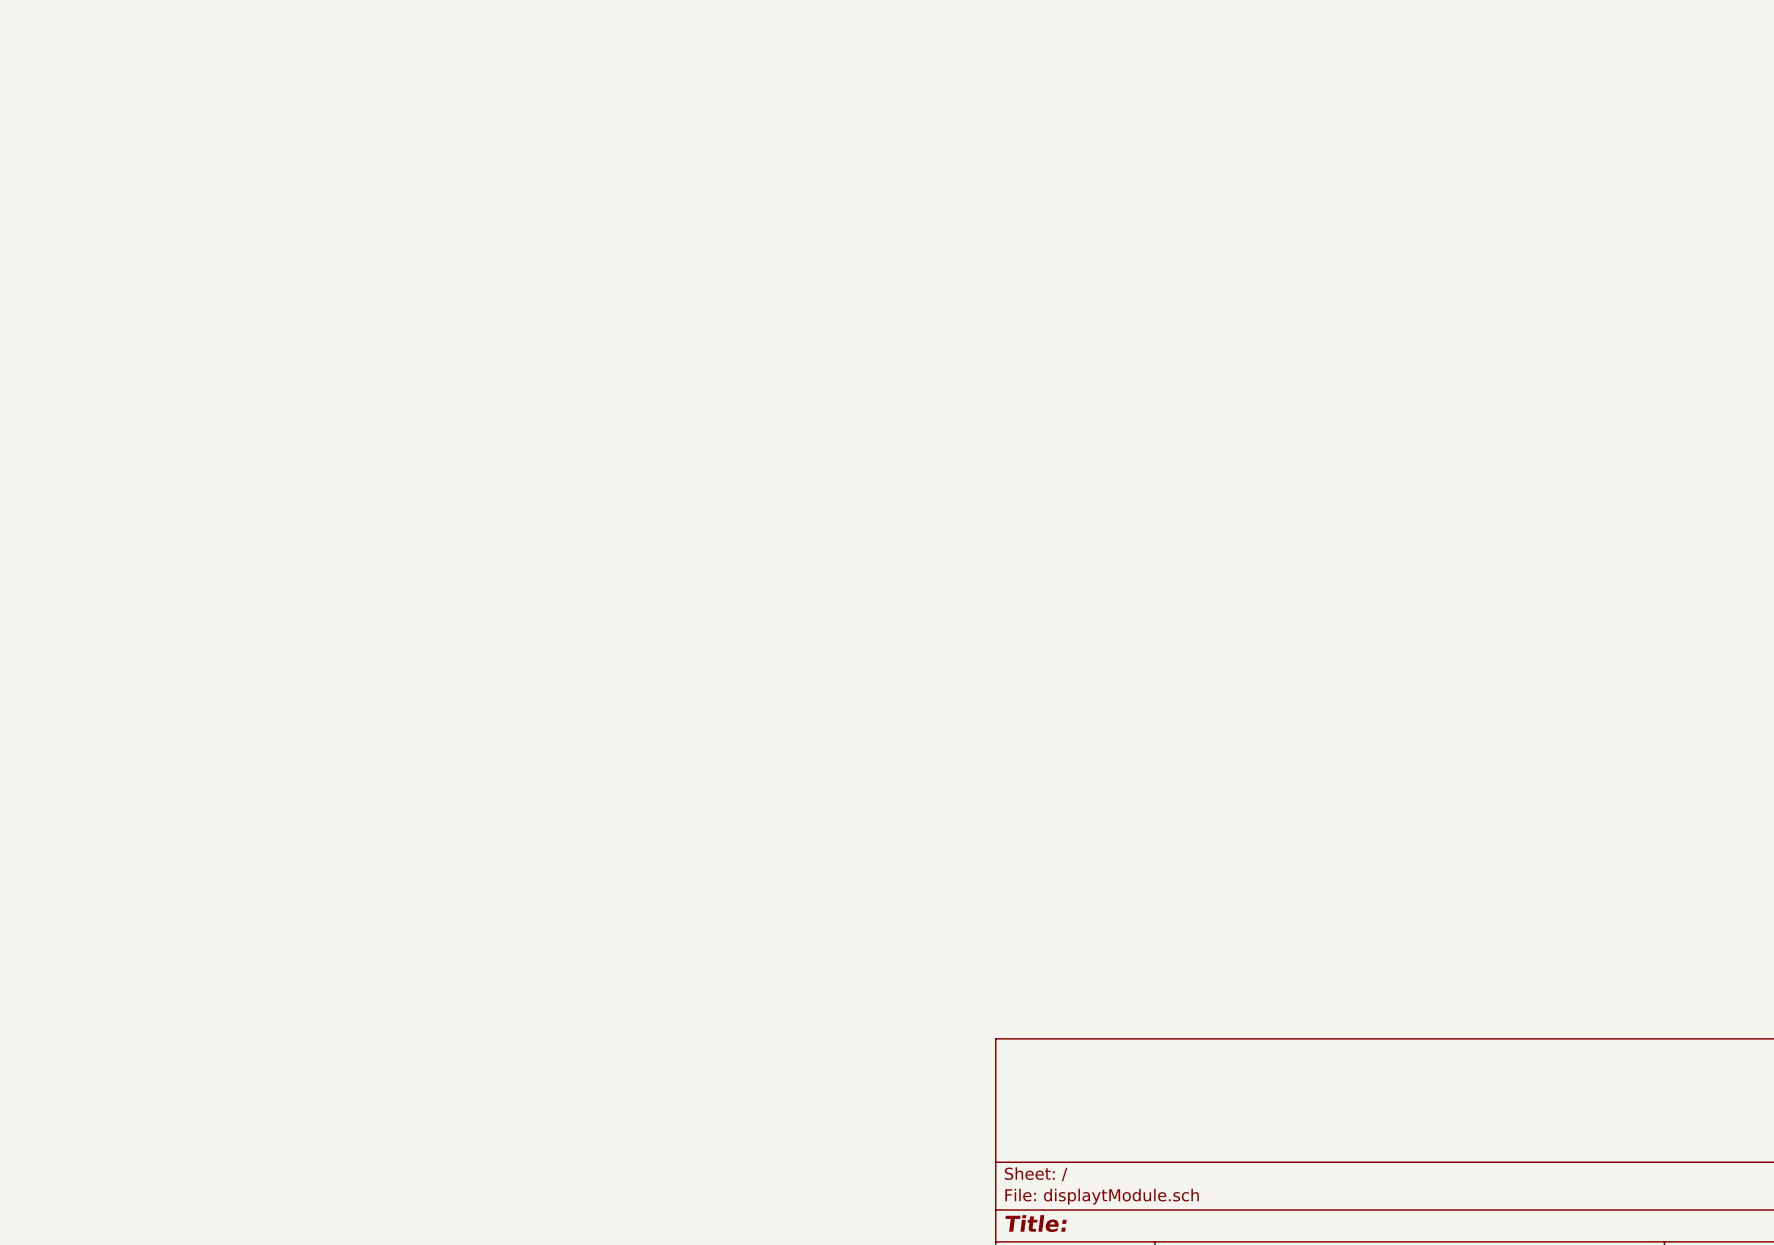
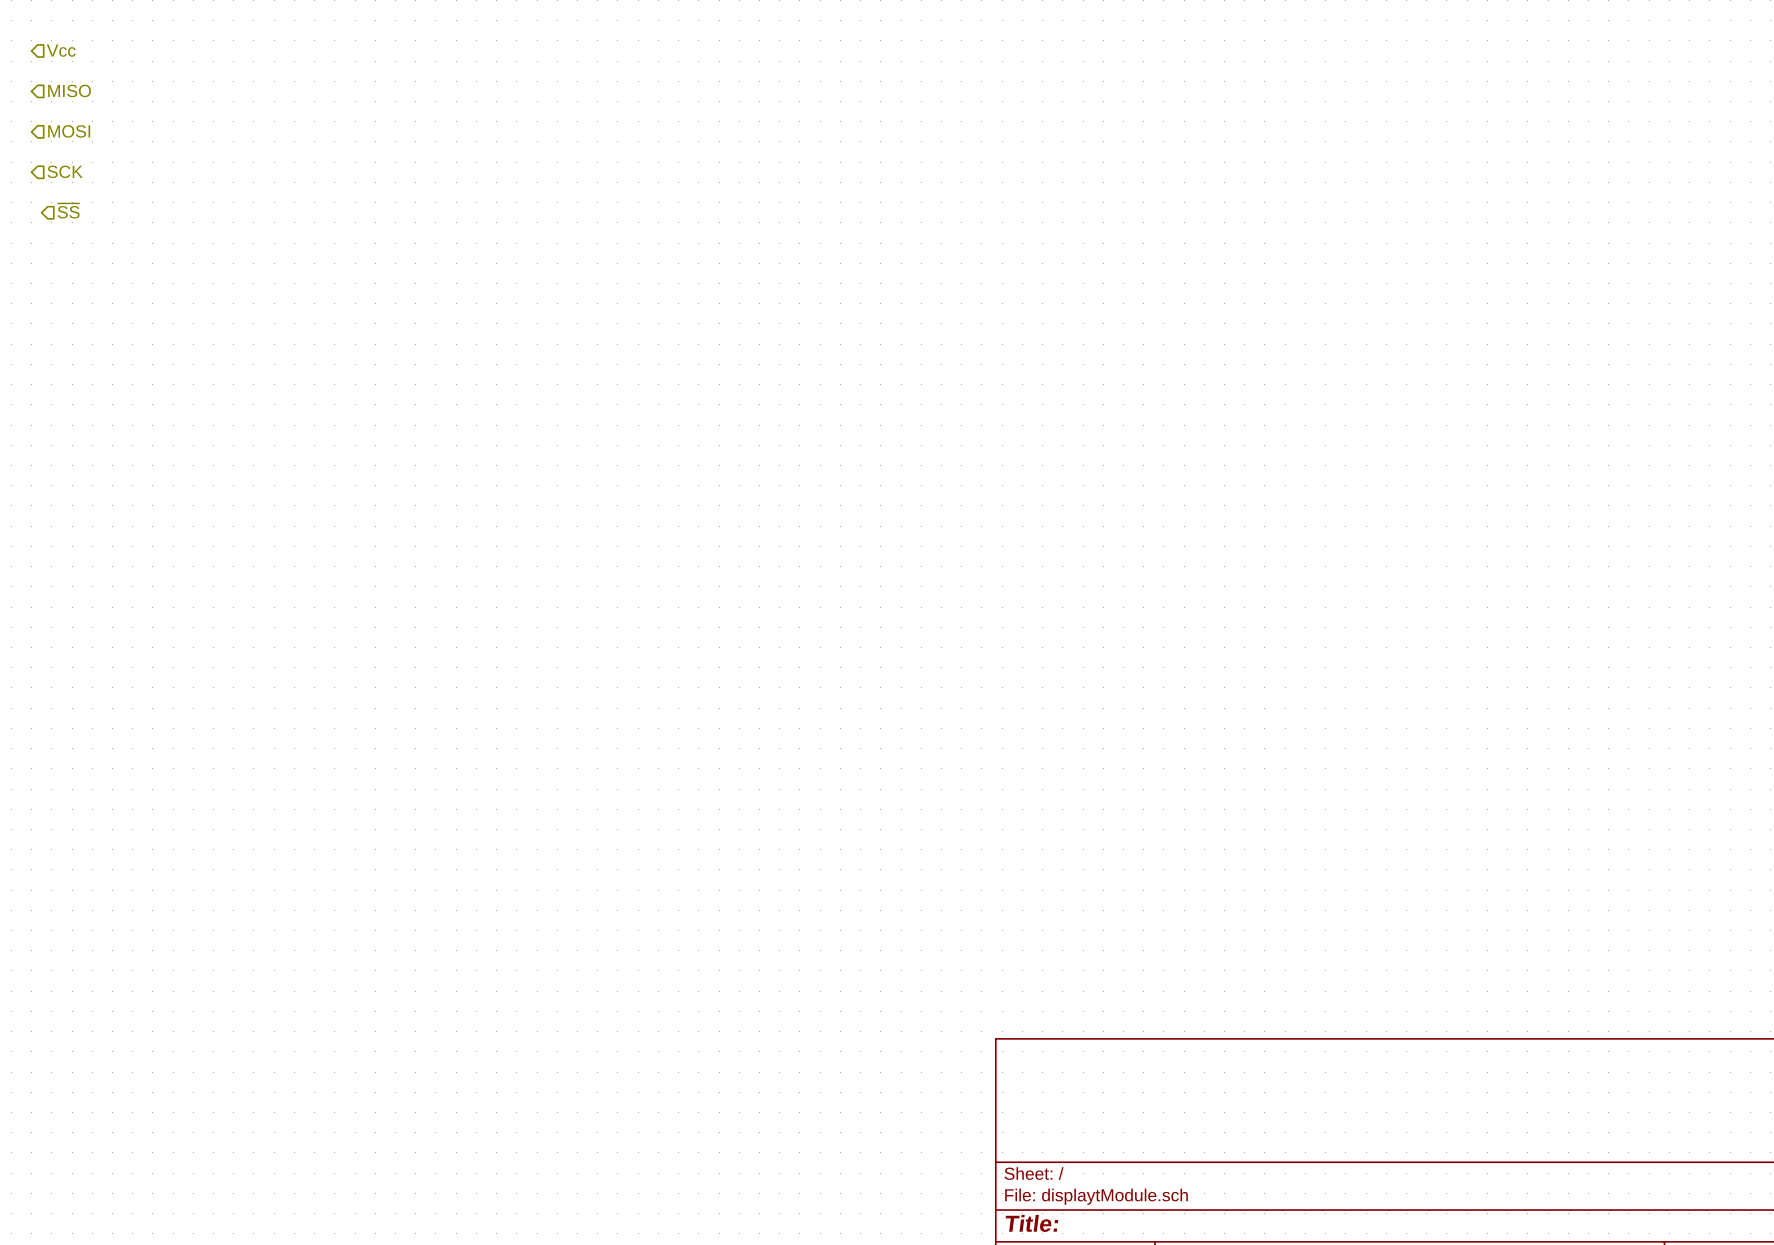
hierarchical label: none -> Vcc (61, 50)
hierarchical label: none -> MISO (69, 90)
hierarchical label: none -> MOSI (69, 131)
hierarchical label: none -> SCK (65, 171)
hierarchical label: none -> ~{SS} (68, 210)

